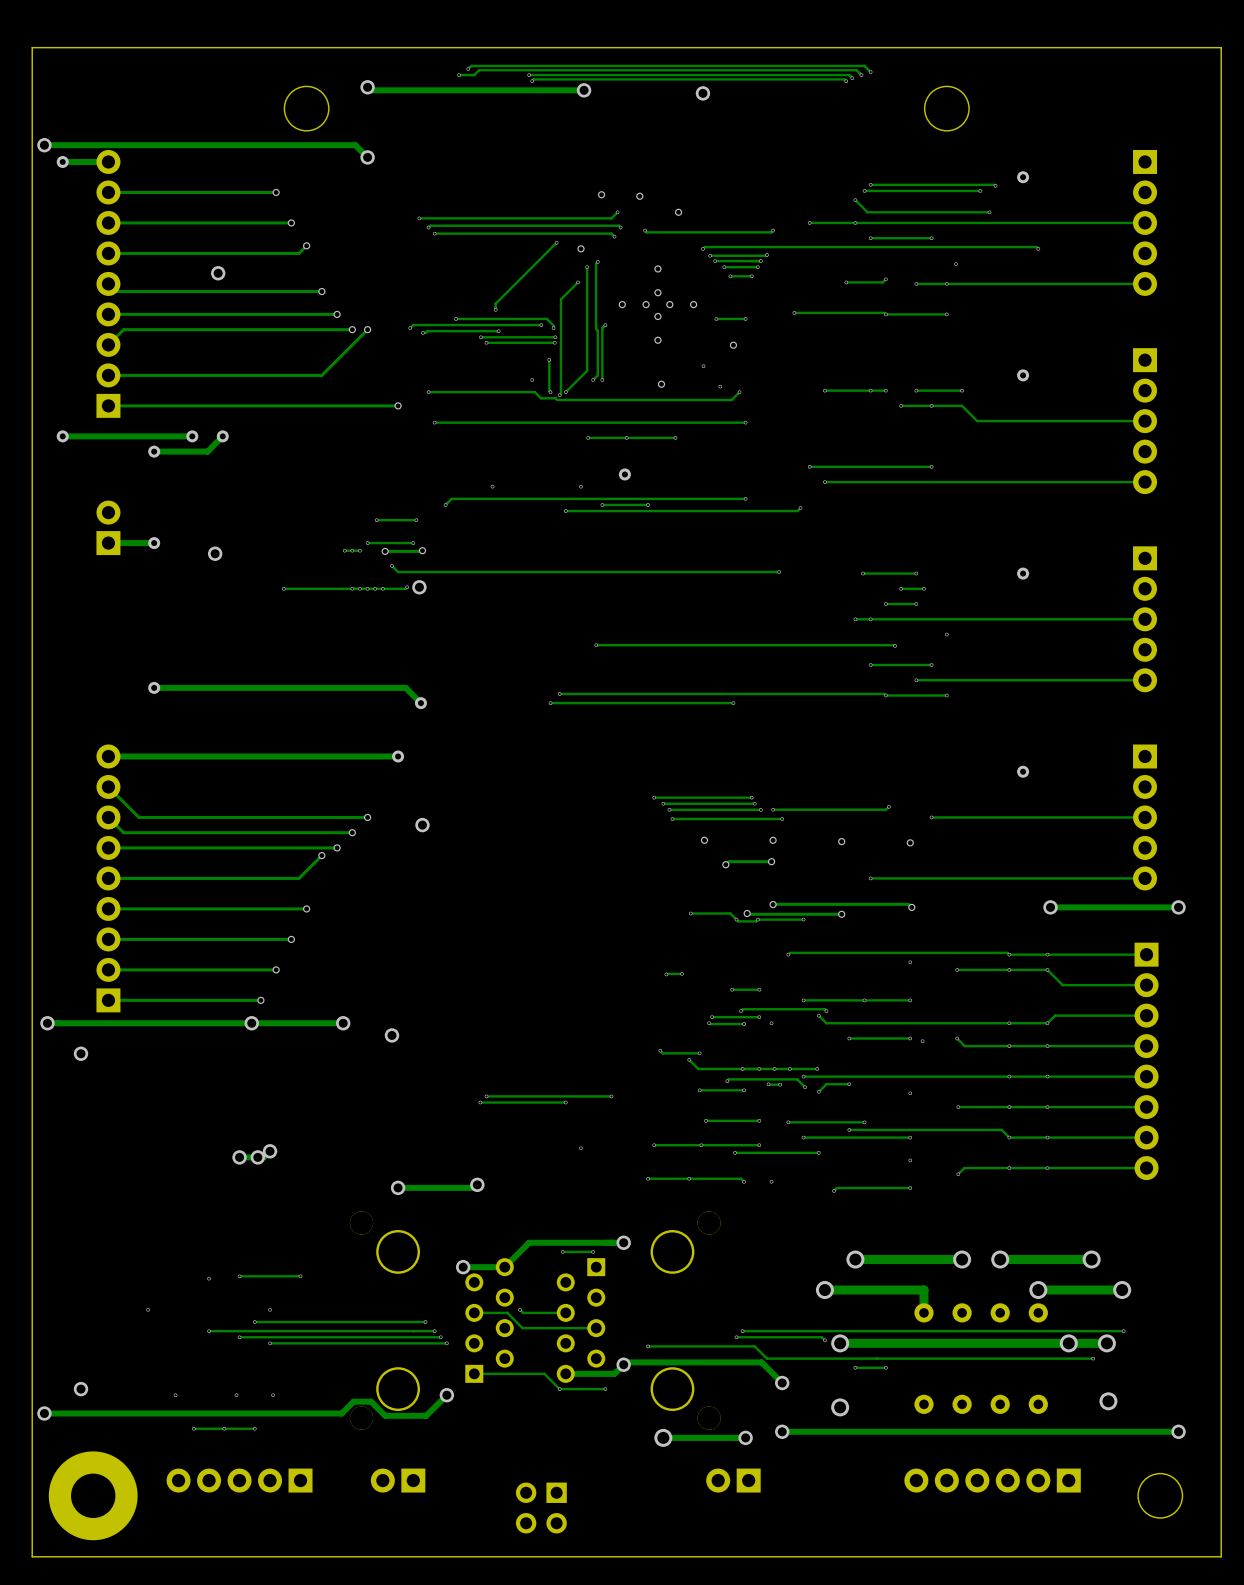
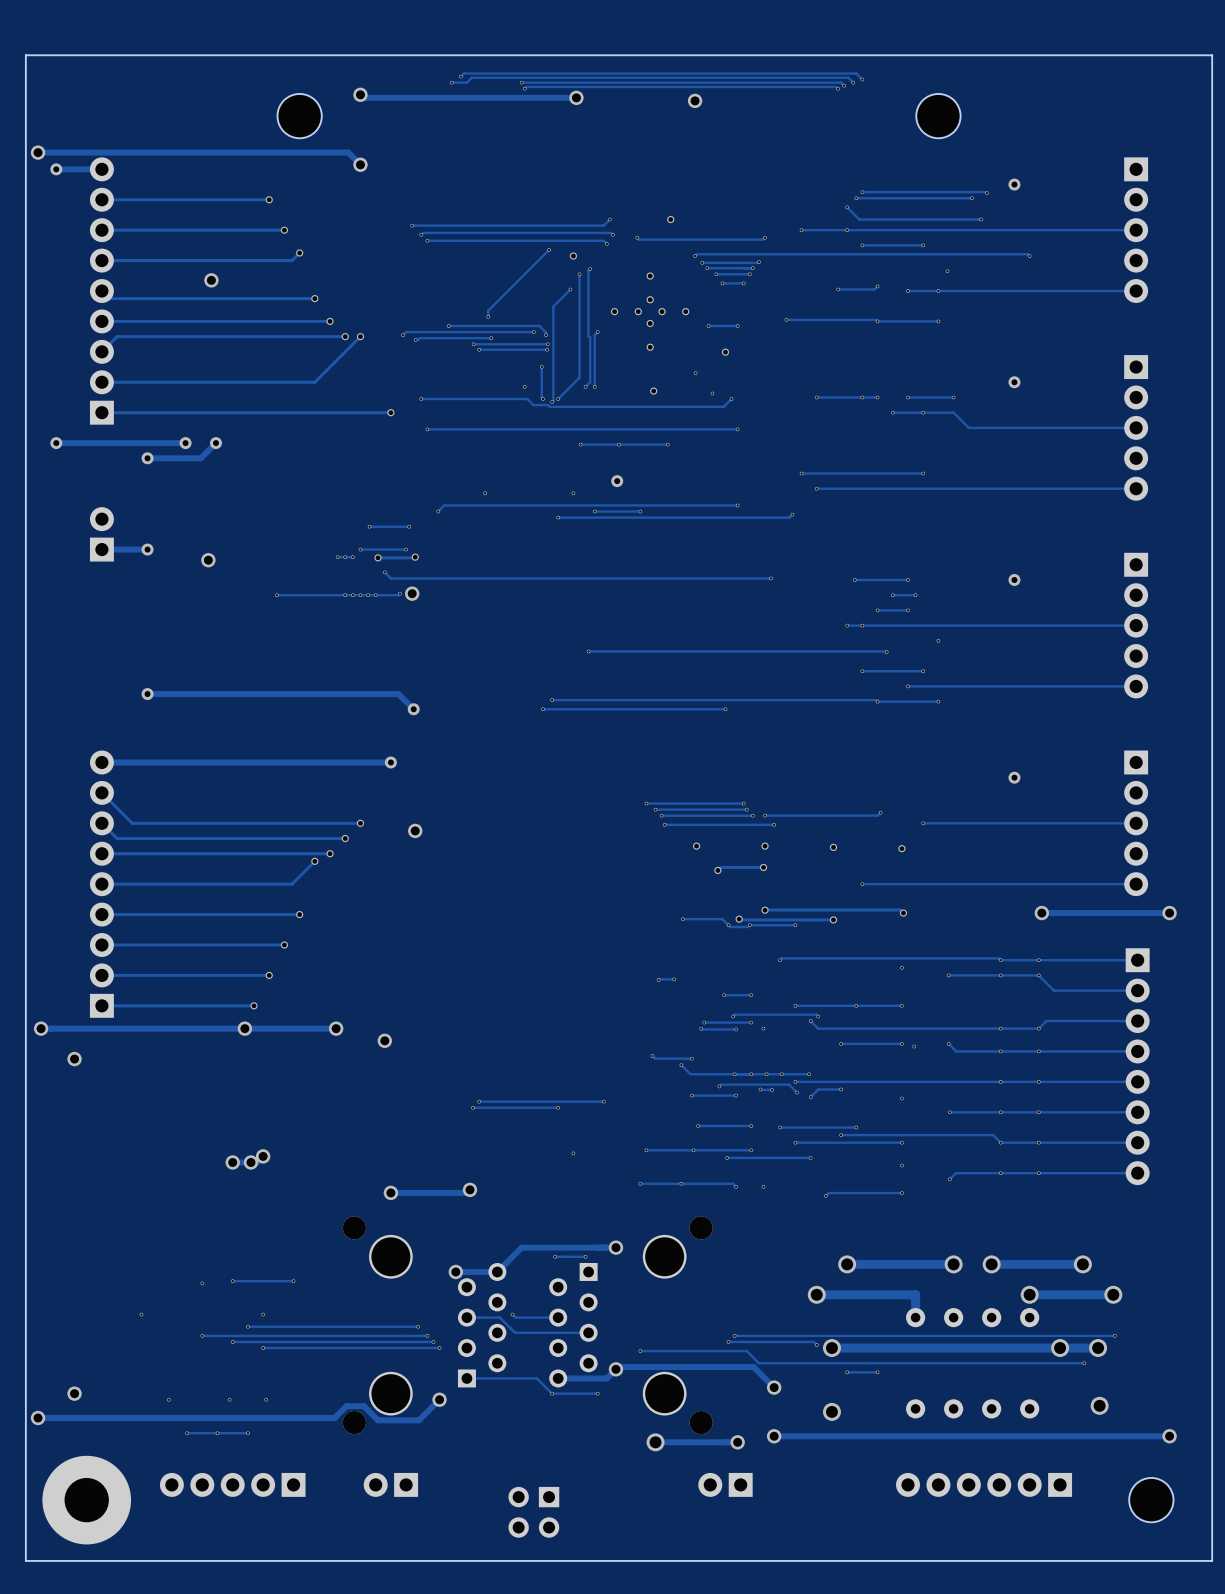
via: (601, 194) -> none
via: (639, 196) -> none

